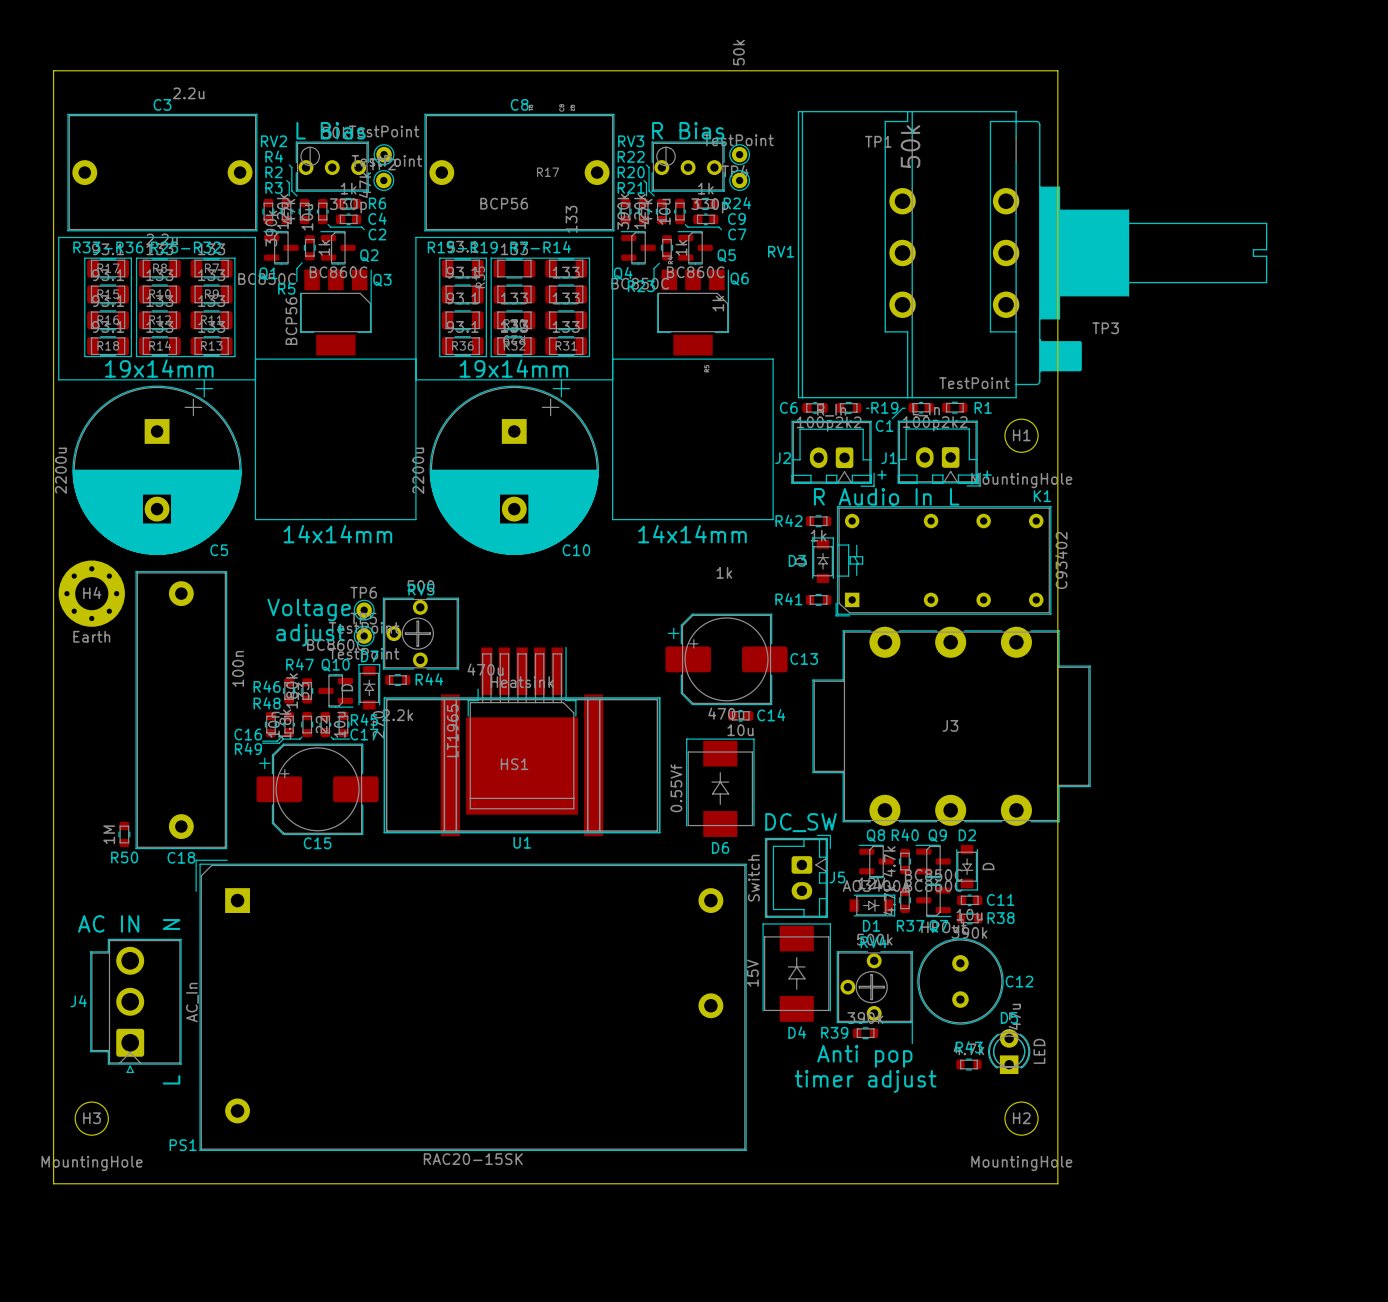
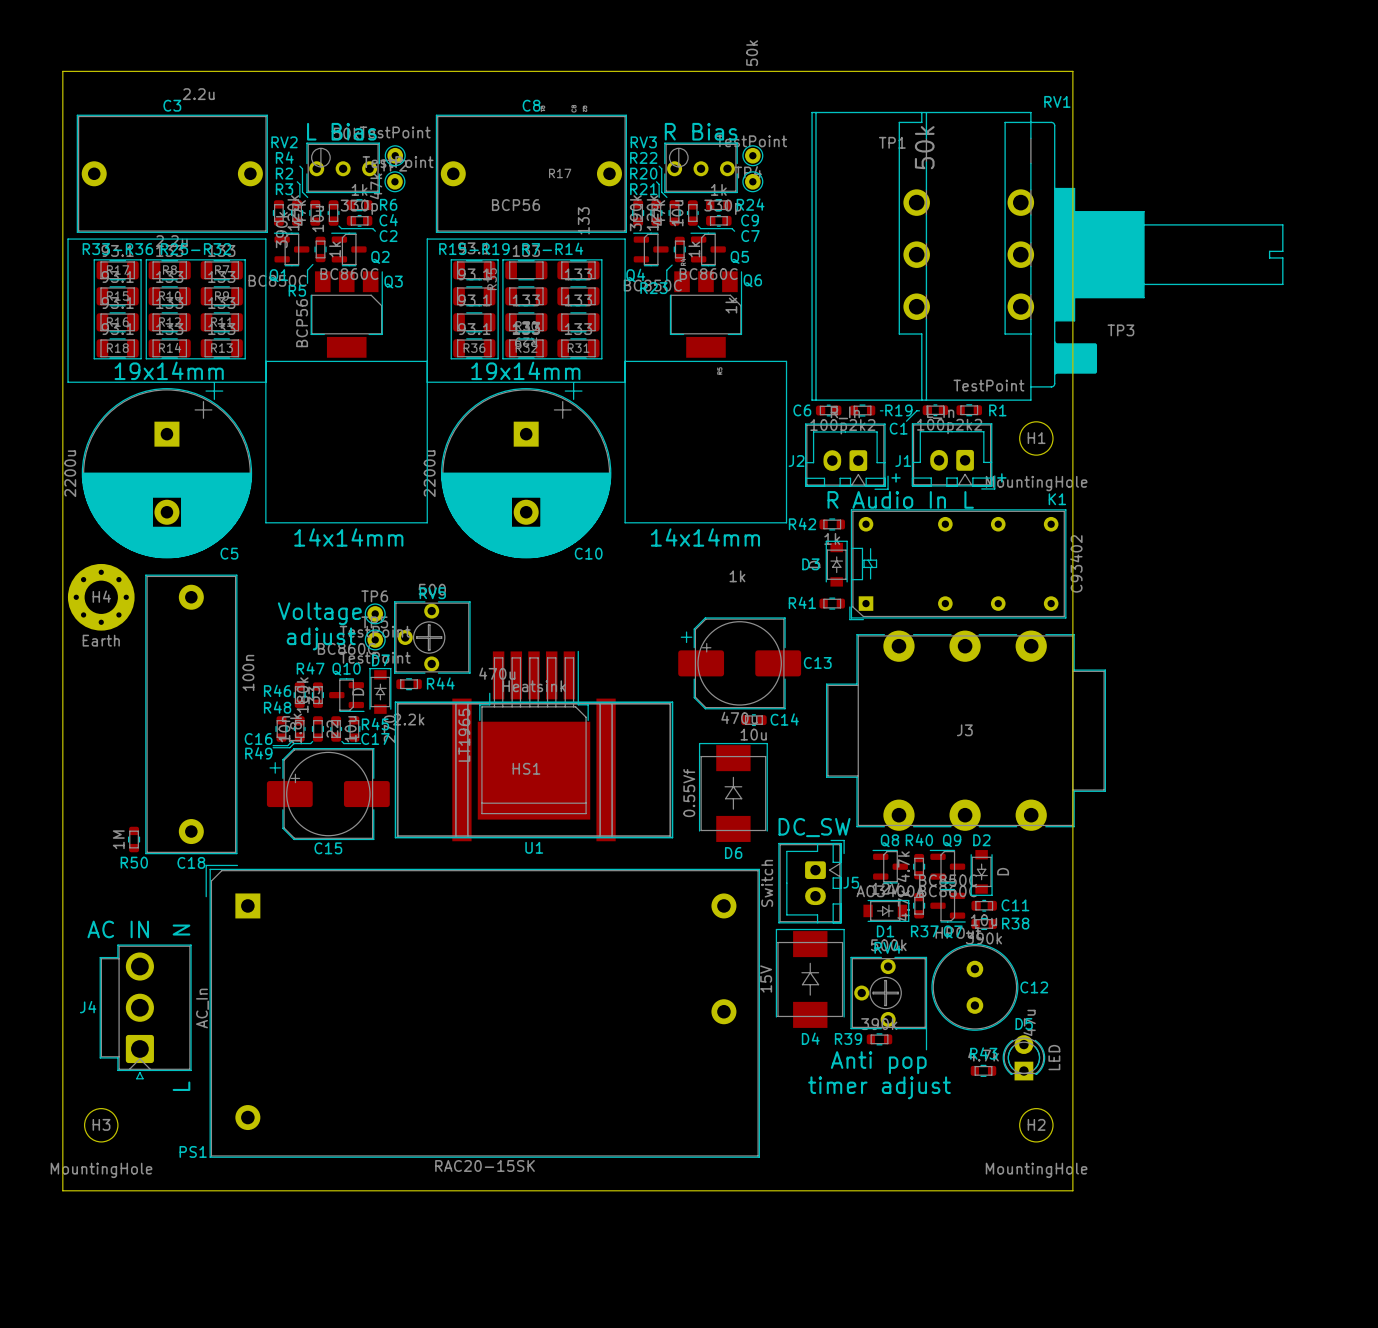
RV1 name position: RV1 (781, 251) -> RV1 (1057, 101)

